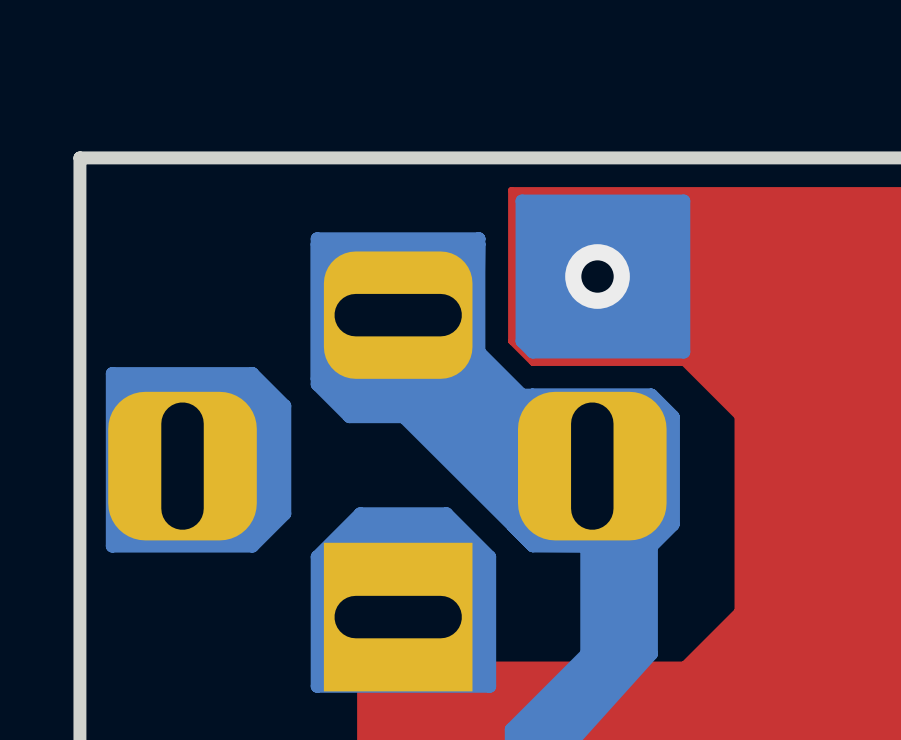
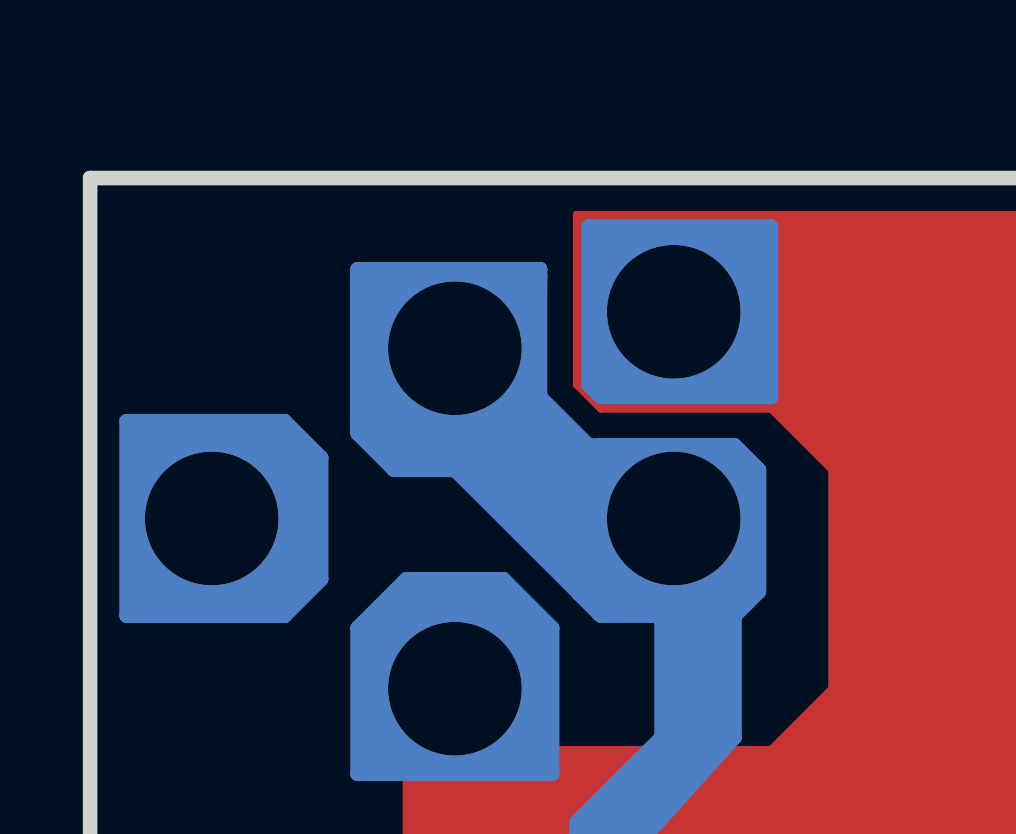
via size: [565, 244, 630, 309] -> [606, 244, 741, 379]
via: none -> (454, 348)
via: none -> (211, 518)
via: none -> (673, 518)
part: (387, 471) -> none
via: none -> (454, 688)

